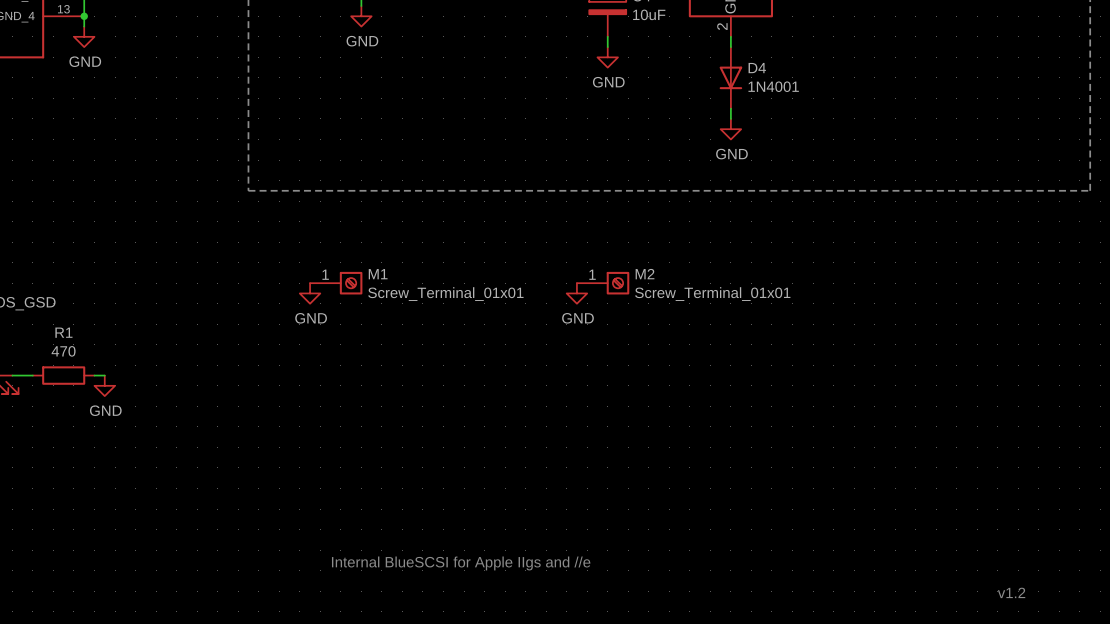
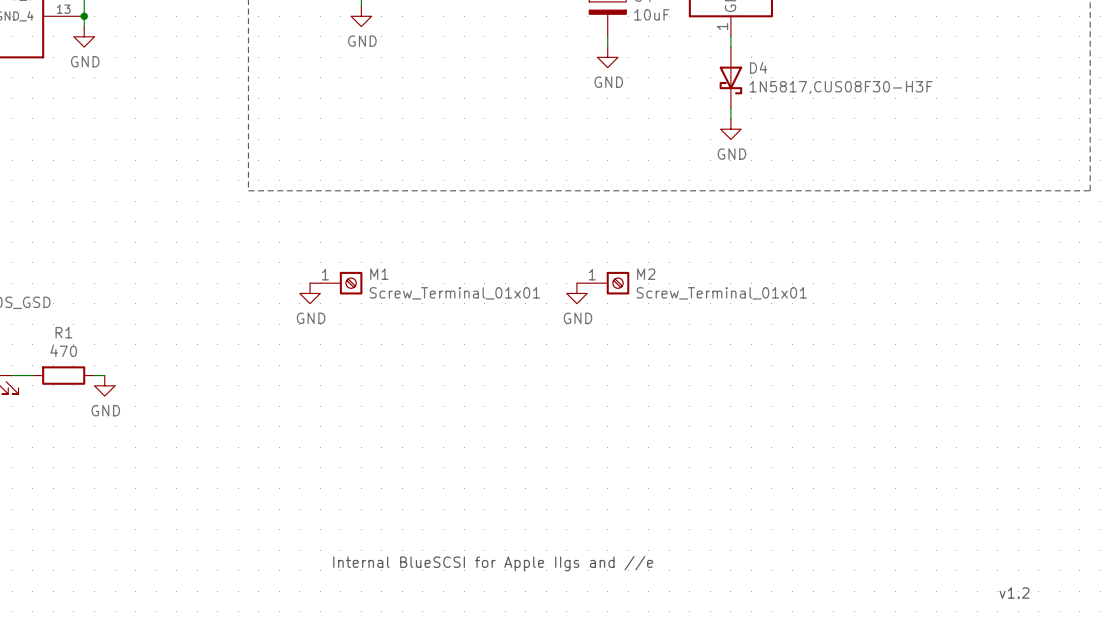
part pin number: 2 (722, 26) -> 1 (722, 26)
D4 symbol: [719, 47, 743, 109] -> [719, 47, 743, 109]
D4 value: 1N4001 (773, 86) -> 1N5817,CUS08F30-H3F (841, 87)

